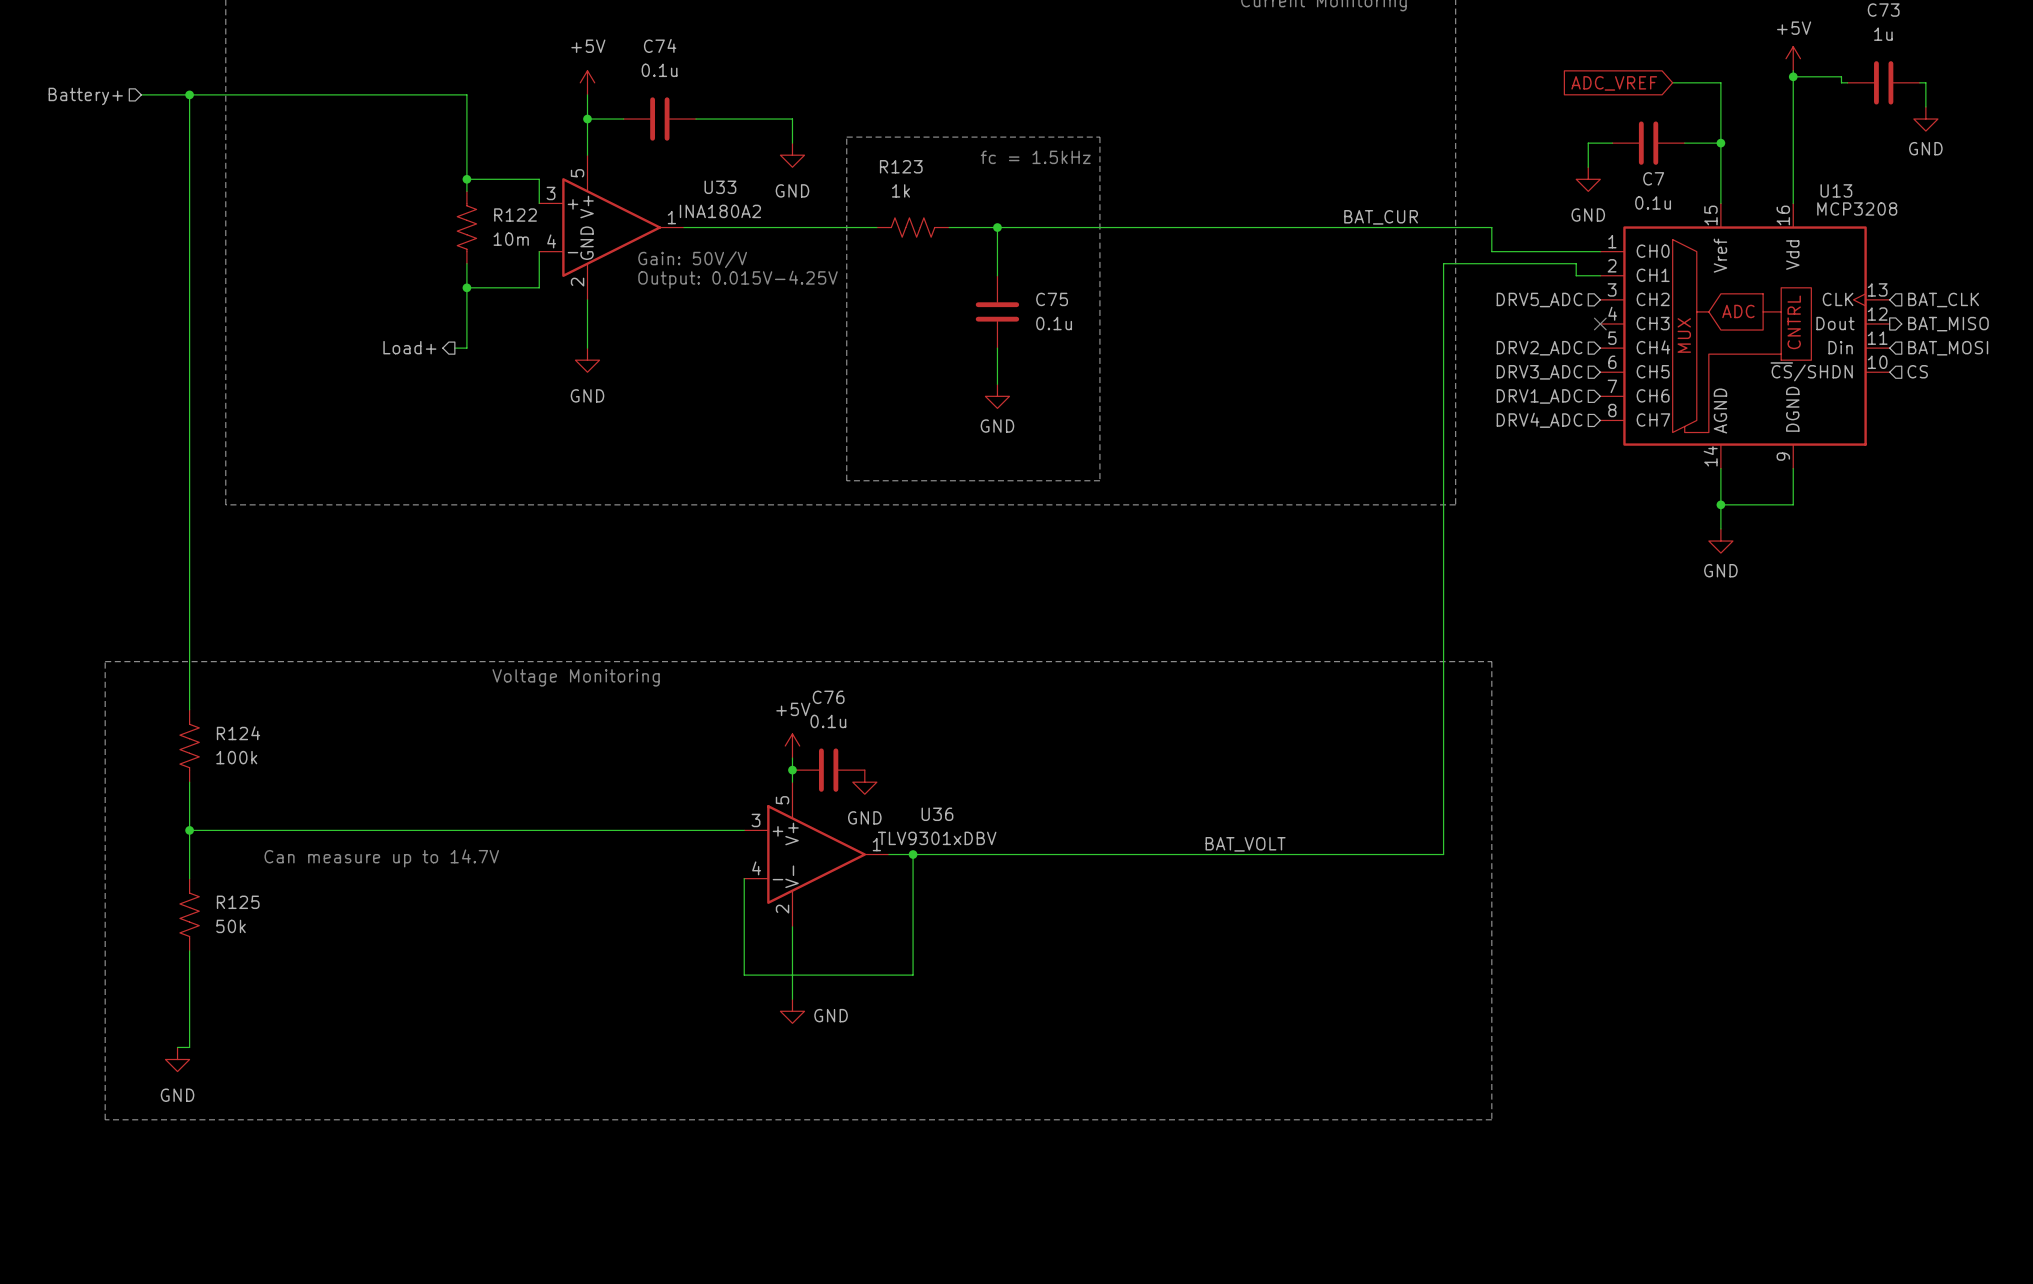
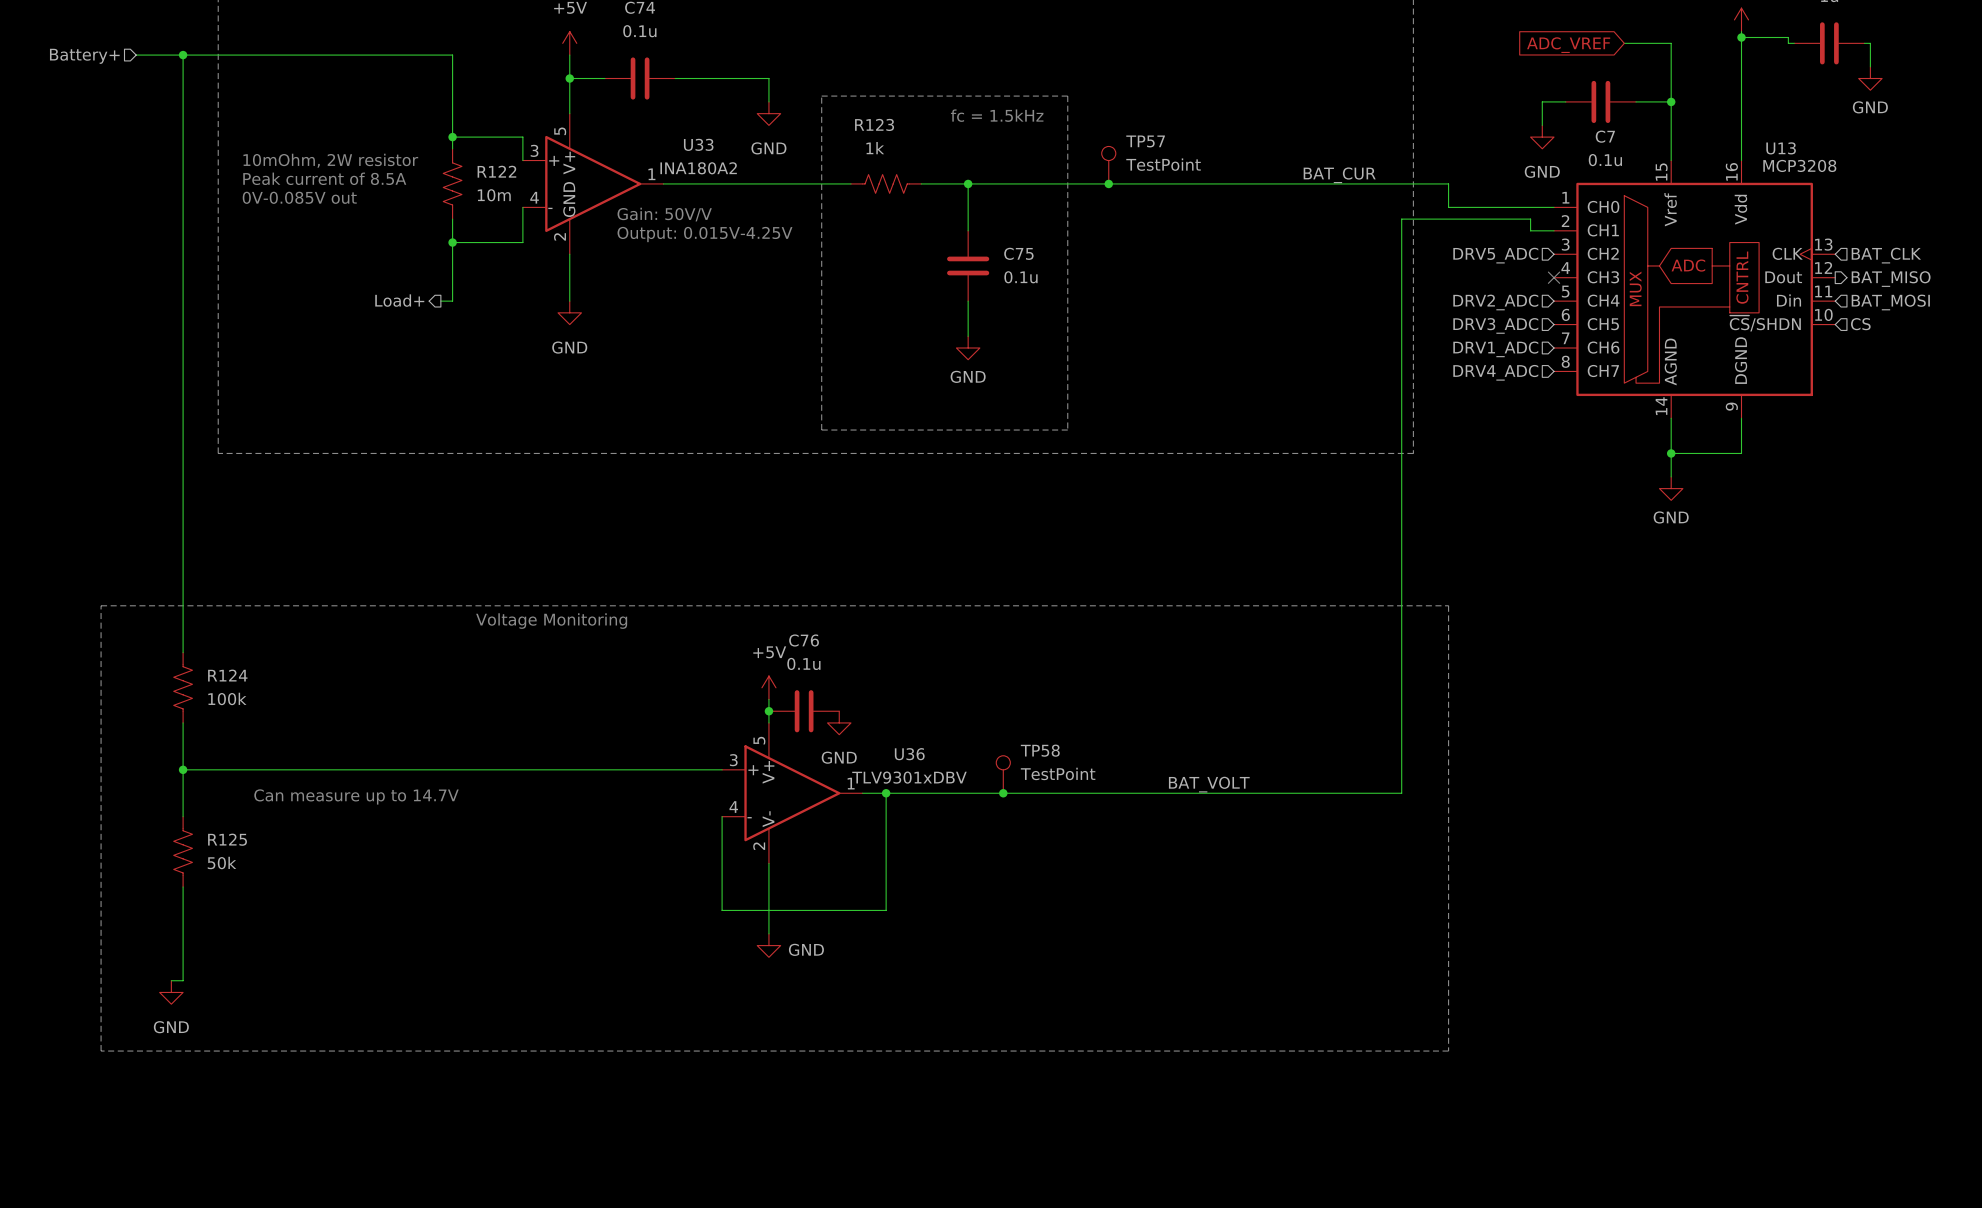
text: none -> 10mOhm, 2W resistor (330, 160)
TP57: none -> TestPoint (1108, 165)
text: none -> Peak current of 8.5A (324, 178)
junction: none -> (1108, 183)
text: none -> 0V-0.085V out (299, 197)
TP58: none -> TestPoint (1003, 774)
junction: none -> (1003, 793)

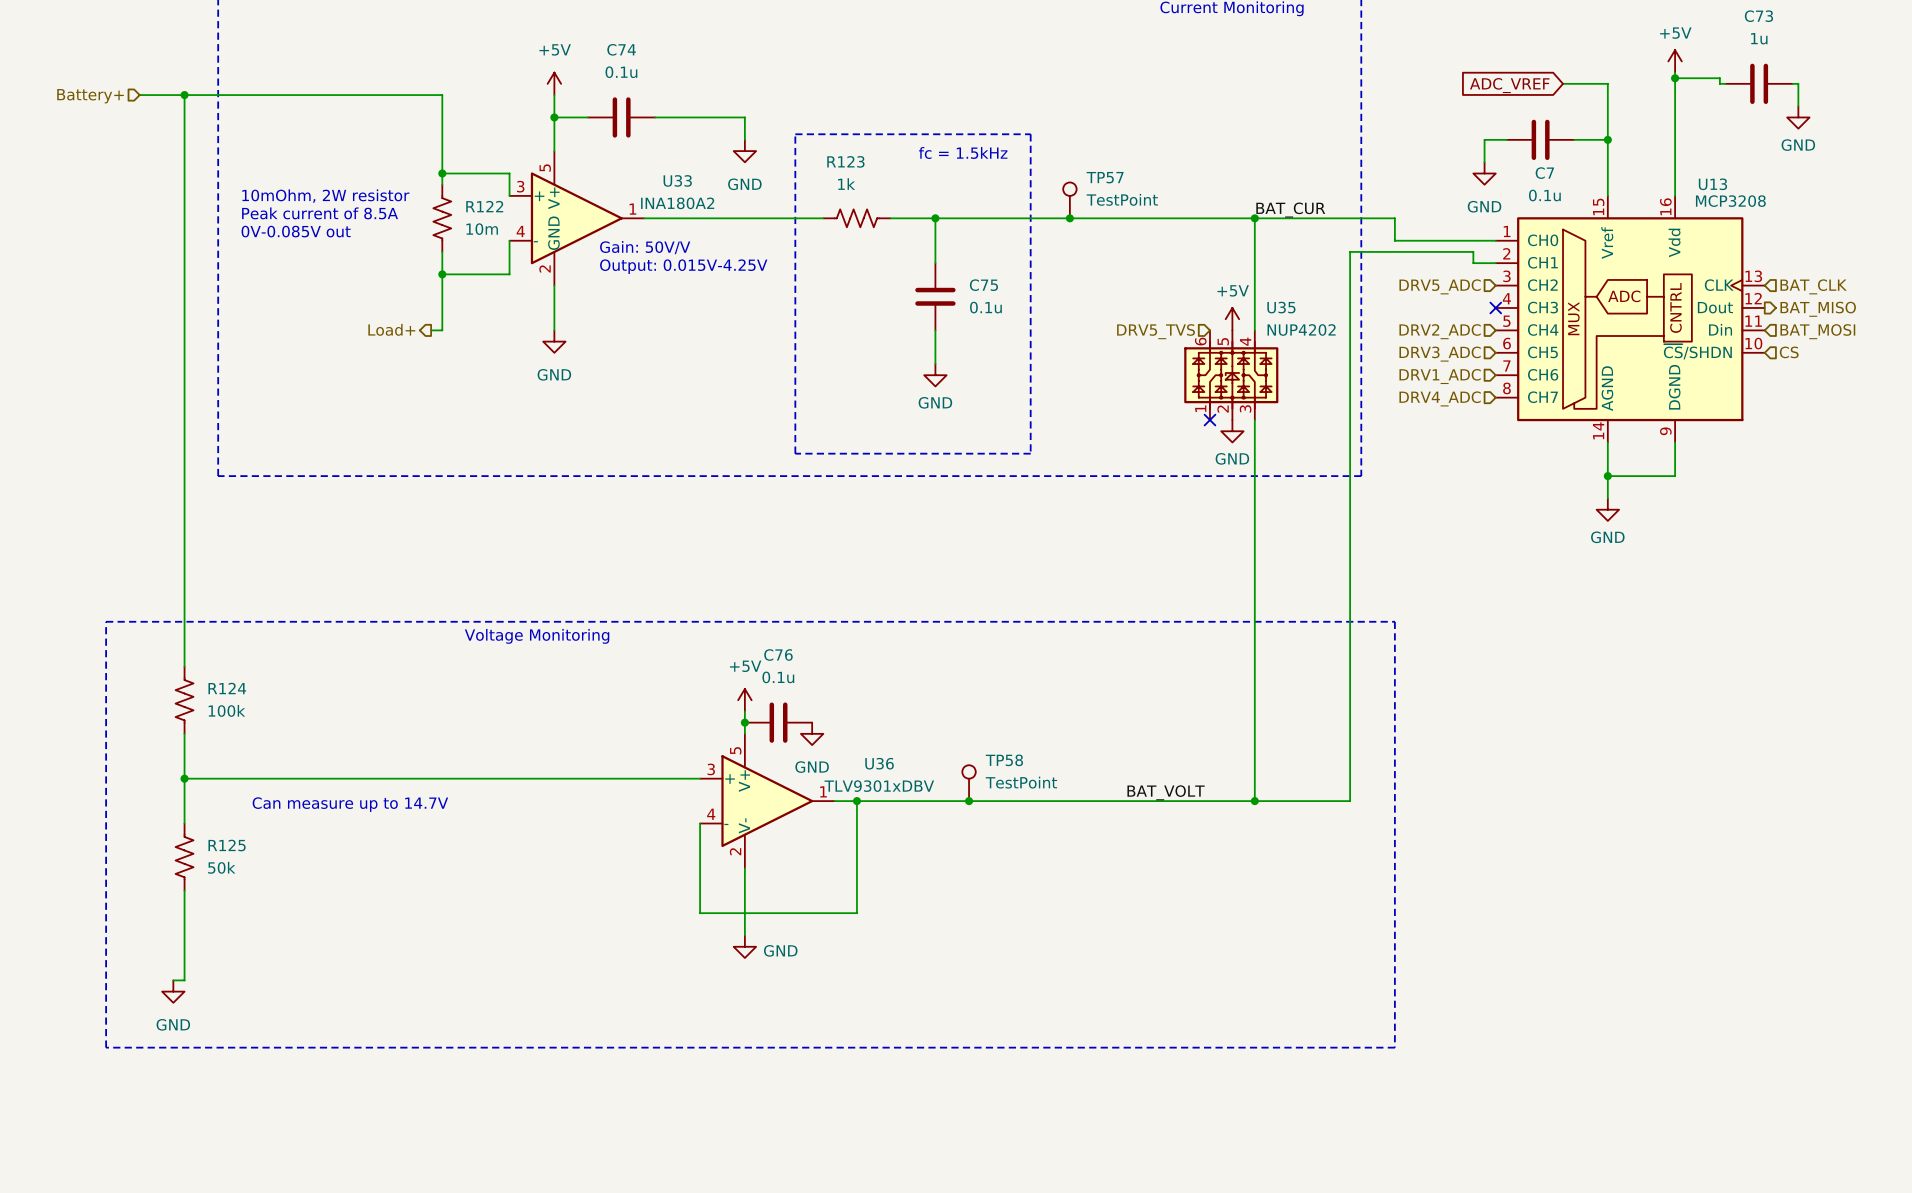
wire: none -> (1254, 218) (1254, 330)
junction: none -> (1254, 218)
power symbol: none -> +5V (1232, 319)
hierarchical label: none -> DRV5_TVS (1156, 331)
U35: none -> NUP4202 (1231, 375)
no-connect mark: none -> (1209, 420)
wire: none -> (1254, 420) (1254, 801)
power symbol: none -> GND (1232, 431)
junction: none -> (1254, 801)

